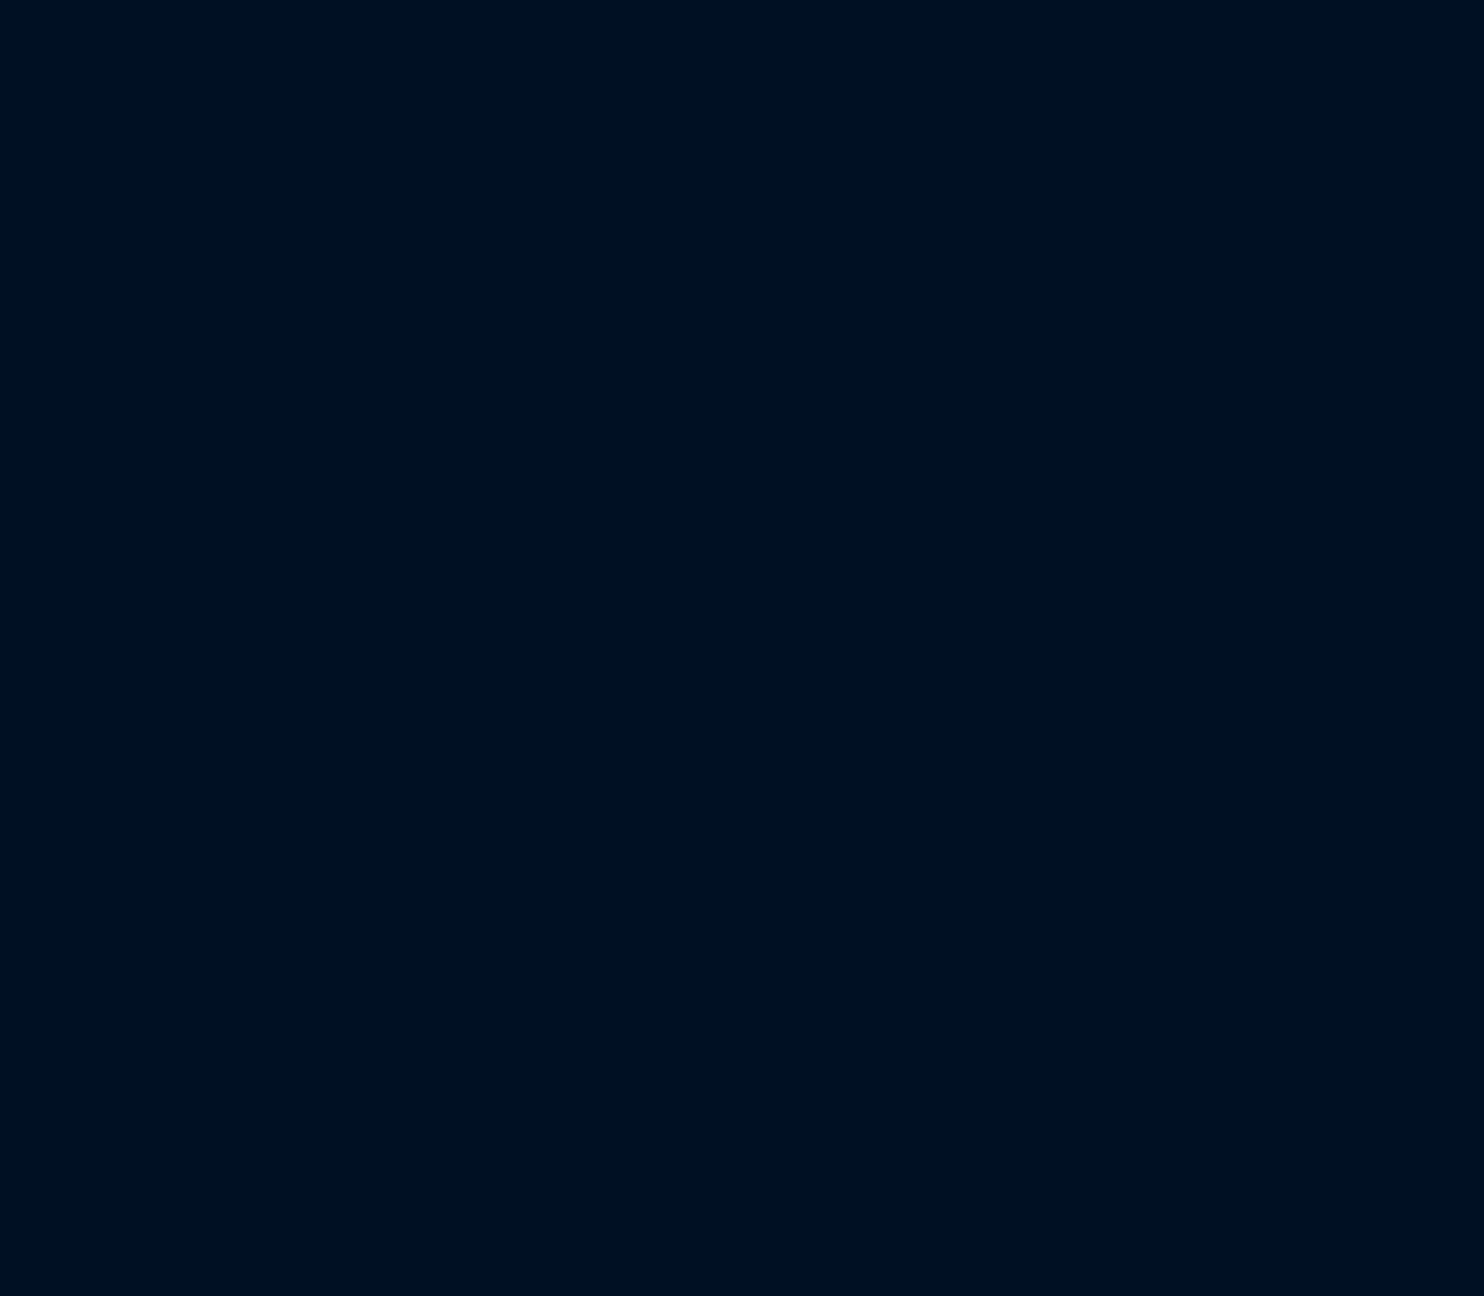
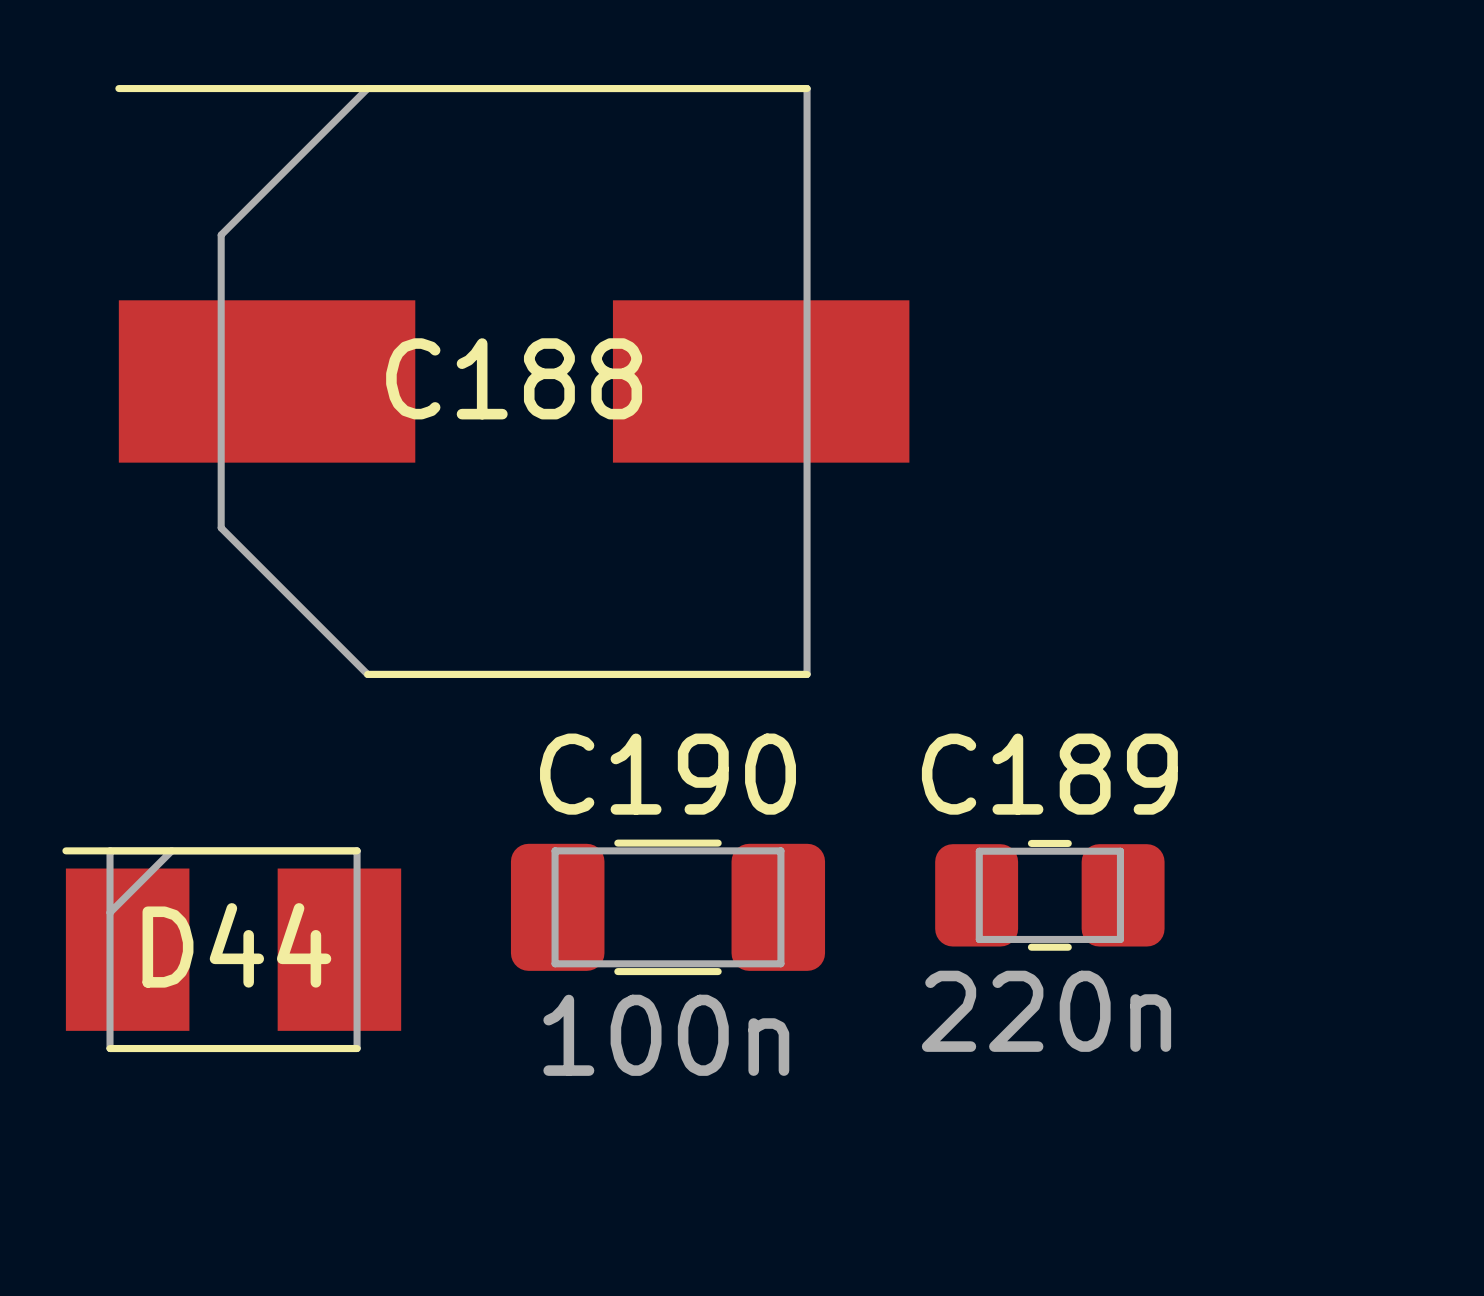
C188: none -> (512, 381)
C189: none -> 220n (1049, 895)
C190: none -> 100n (667, 907)
D44: none -> (231, 949)

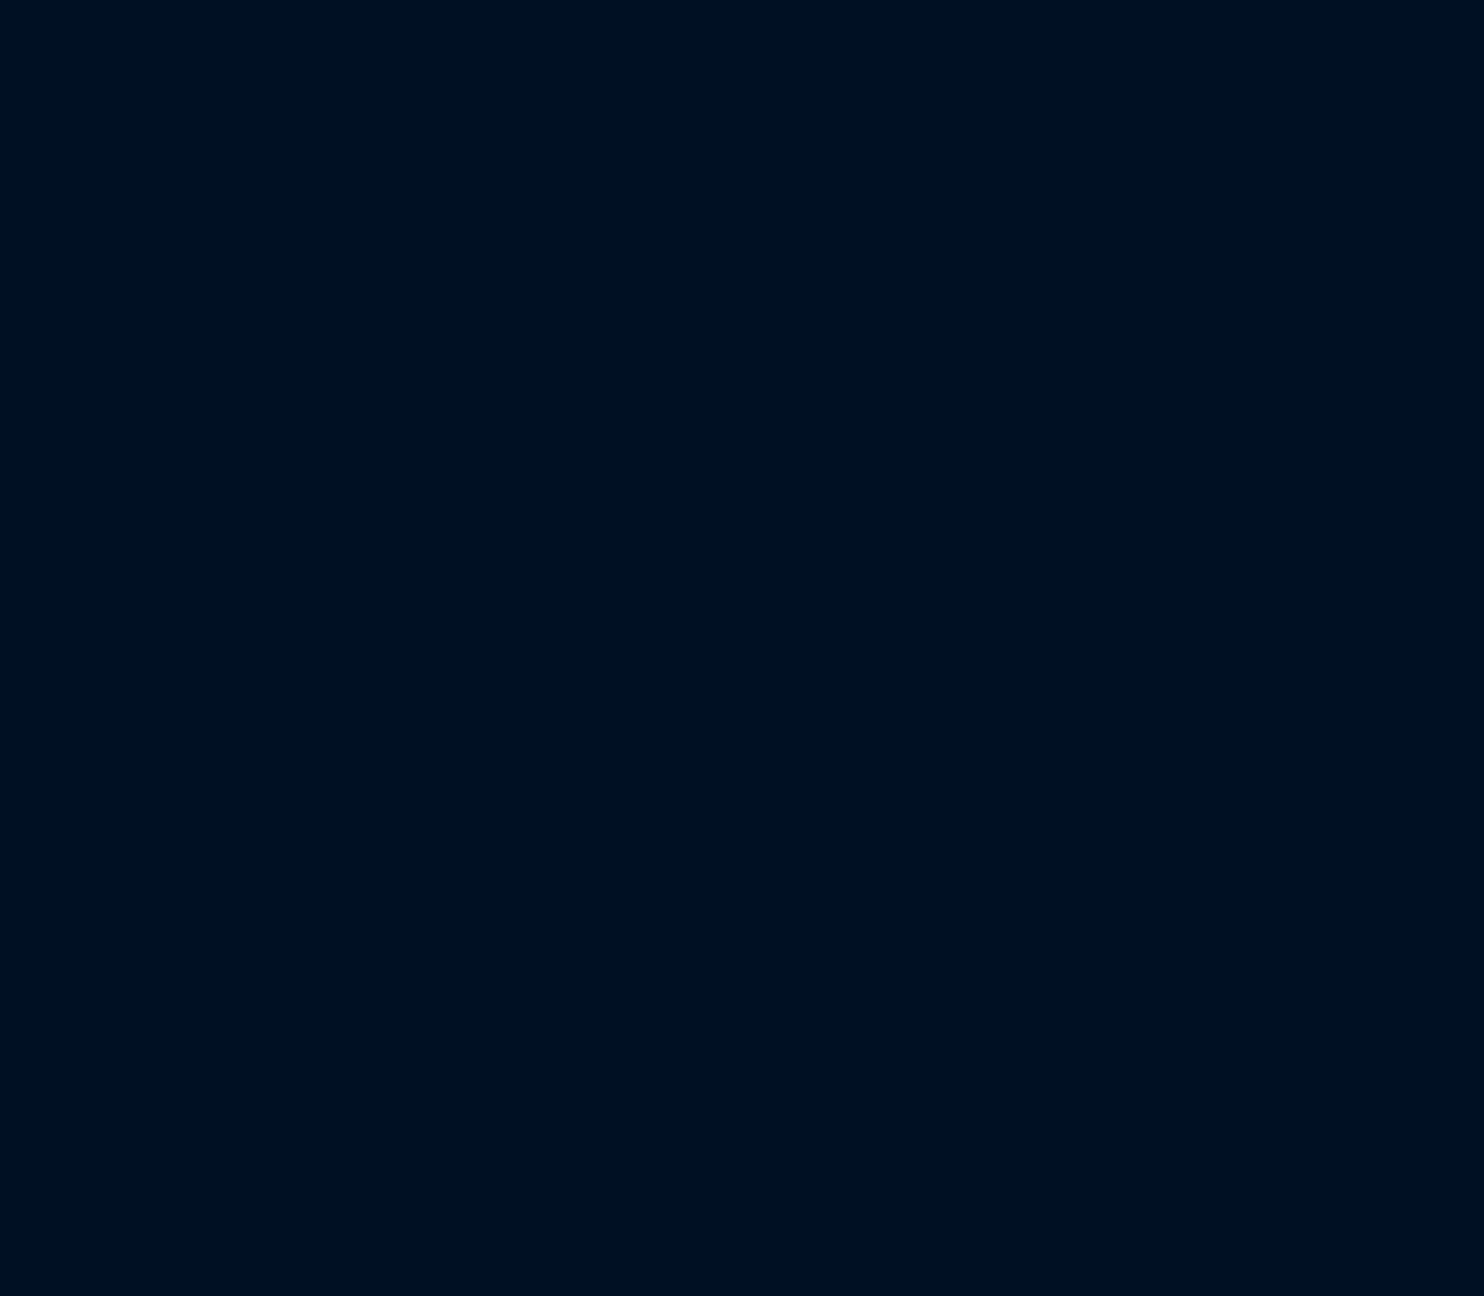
C188: (512, 381) -> none
C189: 220n (1049, 895) -> none
C190: 100n (667, 907) -> none
D44: (231, 949) -> none

